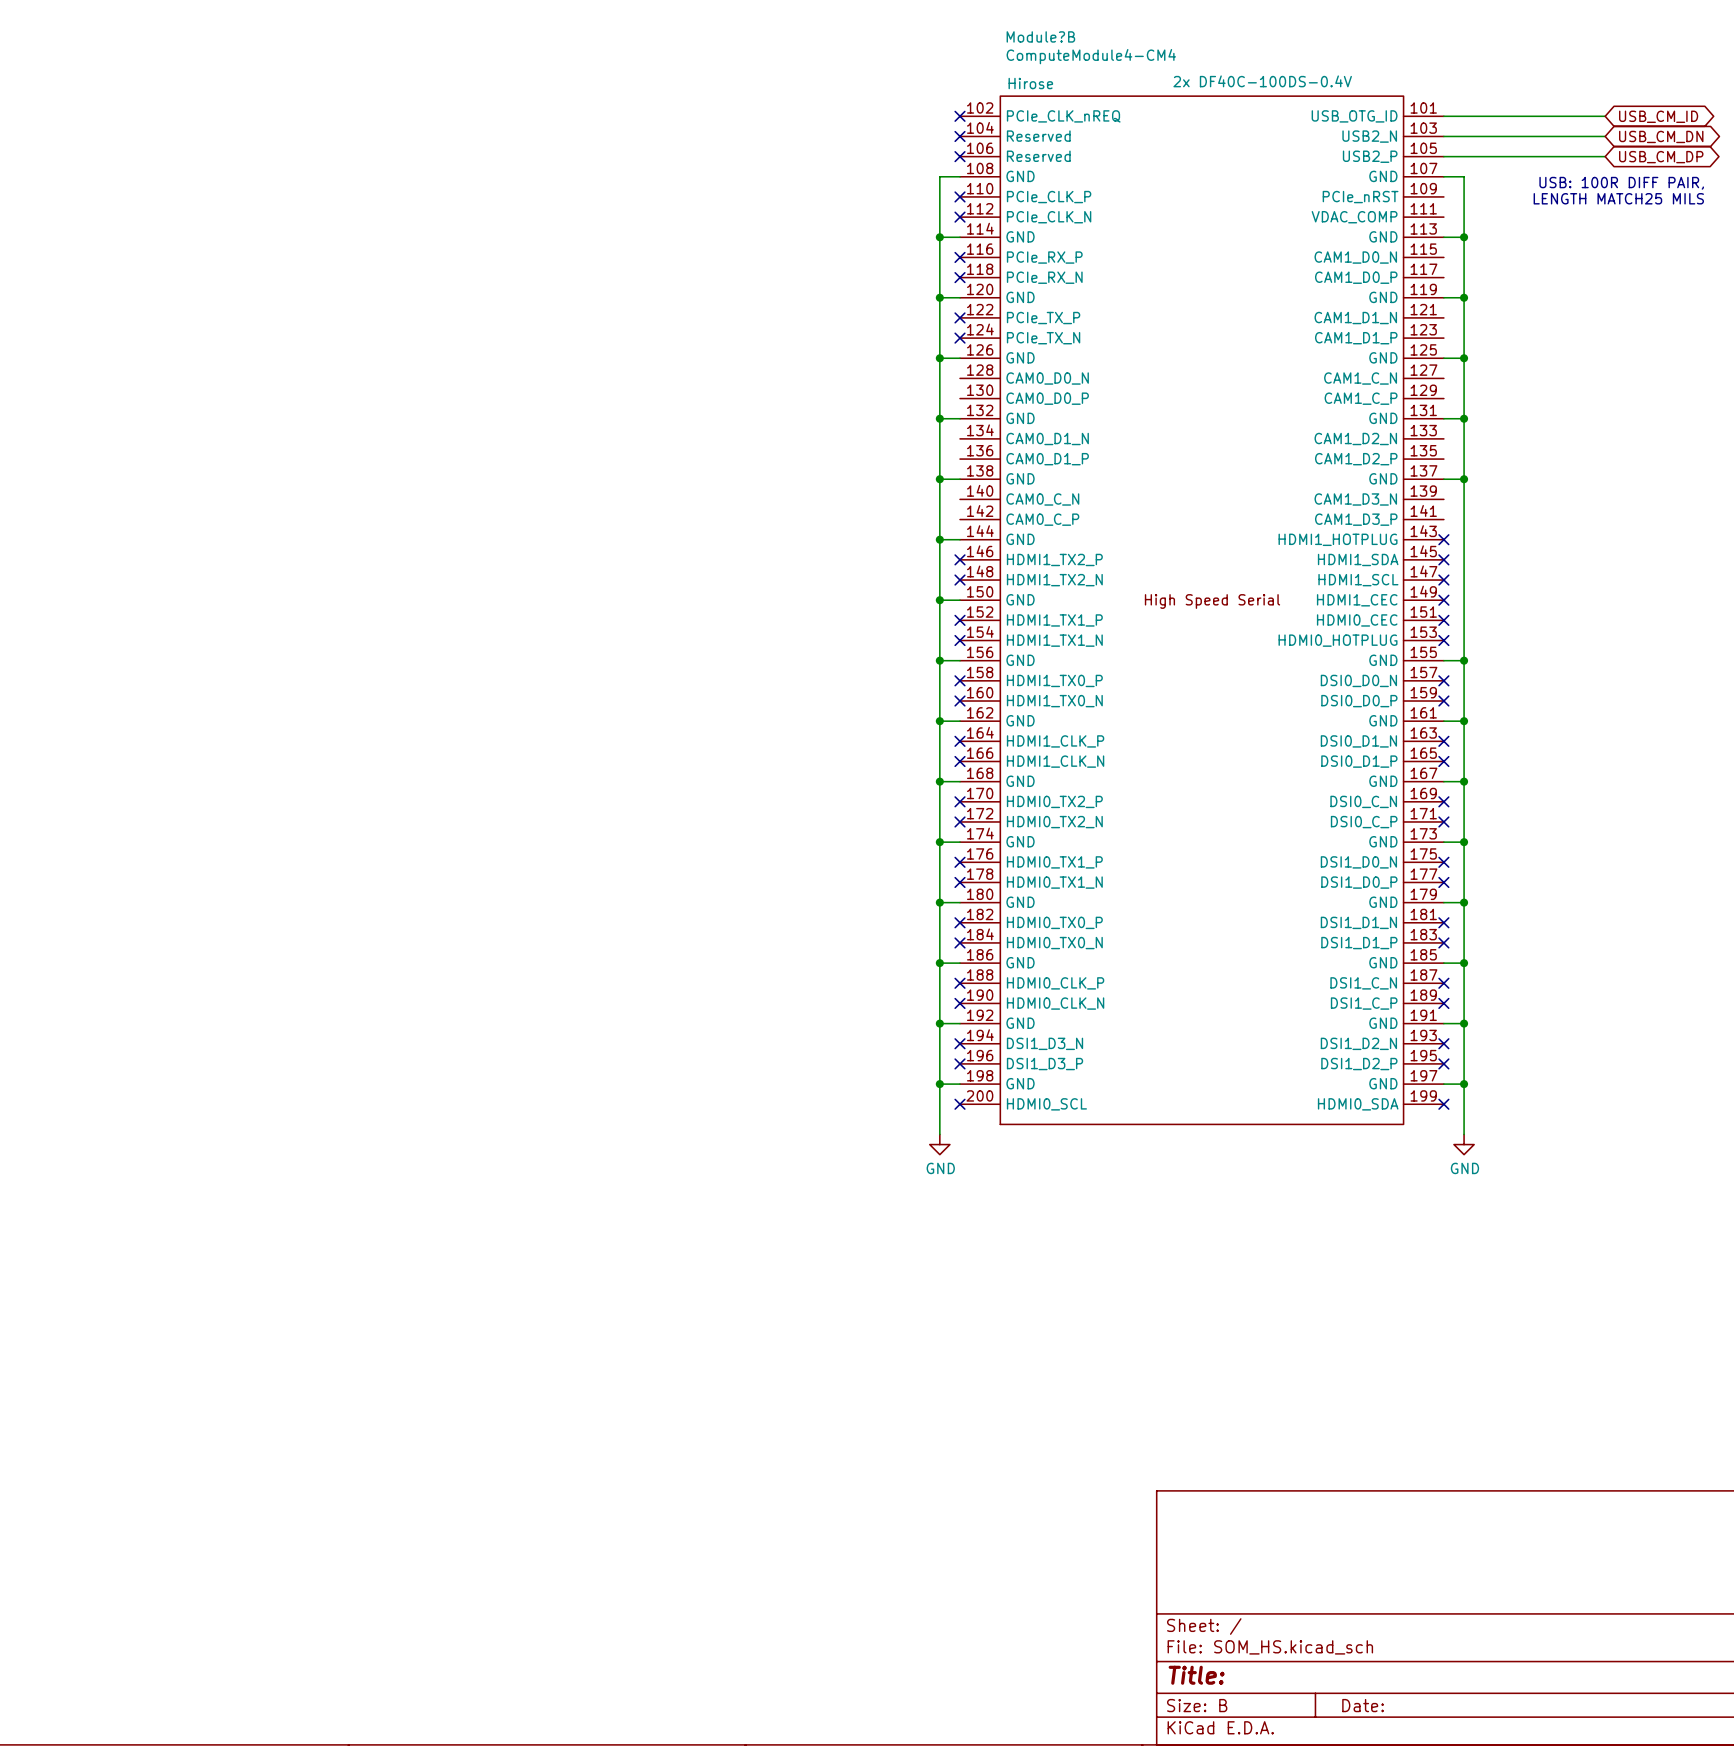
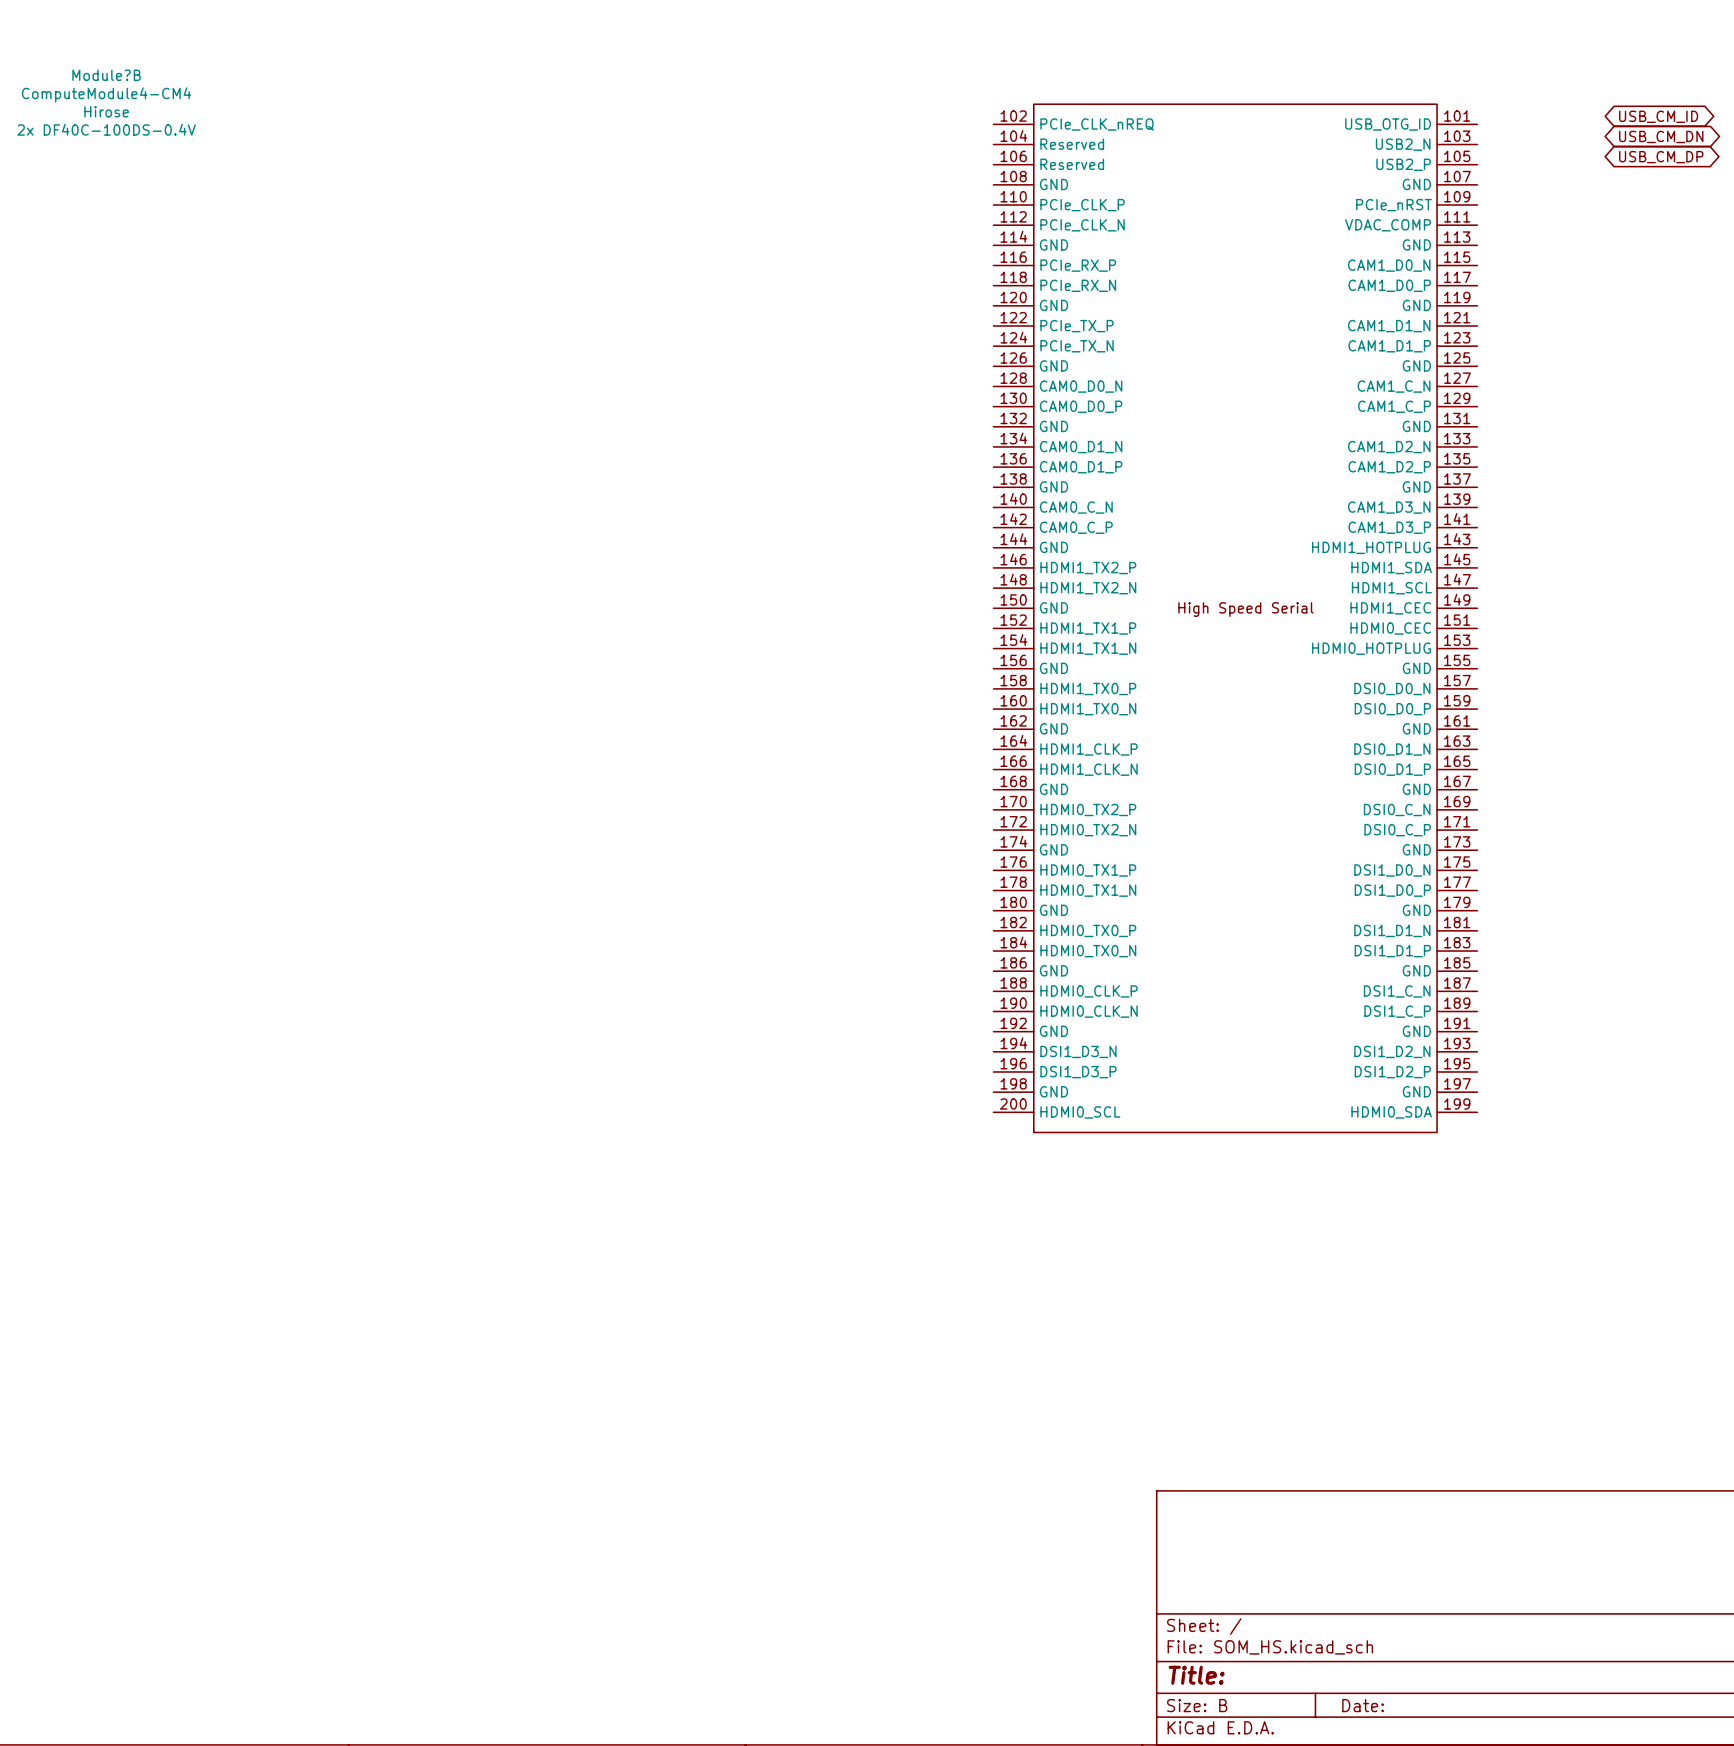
Module?B name position: Module?B (1040, 36) -> Module?B (106, 75)
Module?B value position: ComputeModule4-CM4 (1091, 56) -> ComputeModule4-CM4 (106, 94)
Module?B text position: 2x DF40C-100DS-0.4V (1262, 81) -> 2x DF40C-100DS-0.4V (106, 129)
Module?B text position: Hirose (1030, 83) -> Hirose (106, 111)
no-connect mark: (960, 116) -> none
wire: (1443, 116) (1605, 116) -> none
no-connect mark: (960, 136) -> none
wire: (1443, 136) (1605, 136) -> none
no-connect mark: (960, 156) -> none
wire: (1443, 156) (1605, 156) -> none
wire: (960, 176) (939, 176) (939, 1134) -> none
wire: (1443, 176) (1464, 176) (1464, 1134) -> none
text: USB: 100R DIFF PAIR, (1621, 183) -> none
no-connect mark: (960, 196) -> none
text: LENGTH MATCH25 MILS (1618, 198) -> none
no-connect mark: (960, 217) -> none
wire: (939, 237) (960, 237) -> none
junction: (939, 237) -> none
wire: (1443, 237) (1464, 237) -> none
junction: (1464, 237) -> none
no-connect mark: (960, 257) -> none
no-connect mark: (960, 277) -> none
wire: (939, 297) (960, 297) -> none
junction: (939, 297) -> none
wire: (1443, 297) (1464, 297) -> none
junction: (1464, 297) -> none
no-connect mark: (960, 317) -> none
no-connect mark: (960, 338) -> none
wire: (939, 358) (960, 358) -> none
junction: (939, 358) -> none
wire: (1443, 358) (1464, 358) -> none
junction: (1464, 358) -> none
wire: (939, 418) (960, 418) -> none
junction: (939, 418) -> none
wire: (1443, 418) (1464, 418) -> none
junction: (1464, 418) -> none
wire: (939, 479) (960, 479) -> none
junction: (939, 479) -> none
wire: (1443, 479) (1464, 479) -> none
junction: (1464, 479) -> none
wire: (939, 539) (960, 539) -> none
junction: (939, 539) -> none
no-connect mark: (1443, 539) -> none
no-connect mark: (960, 559) -> none
no-connect mark: (1443, 559) -> none
no-connect mark: (960, 580) -> none
no-connect mark: (1443, 580) -> none
wire: (939, 600) (960, 600) -> none
junction: (939, 600) -> none
no-connect mark: (1443, 600) -> none
Module?B position: (1201, 610) -> (1235, 618)
no-connect mark: (960, 620) -> none
no-connect mark: (1443, 620) -> none
no-connect mark: (960, 640) -> none
no-connect mark: (1443, 640) -> none
wire: (939, 660) (960, 660) -> none
junction: (939, 660) -> none
wire: (1443, 660) (1464, 660) -> none
junction: (1464, 660) -> none
no-connect mark: (960, 680) -> none
no-connect mark: (1443, 680) -> none
no-connect mark: (960, 701) -> none
no-connect mark: (1443, 701) -> none
wire: (939, 721) (960, 721) -> none
junction: (939, 721) -> none
wire: (1443, 721) (1464, 721) -> none
junction: (1464, 721) -> none
no-connect mark: (960, 741) -> none
no-connect mark: (1443, 741) -> none
no-connect mark: (960, 761) -> none
no-connect mark: (1443, 761) -> none
wire: (939, 781) (960, 781) -> none
junction: (939, 781) -> none
wire: (1443, 781) (1464, 781) -> none
junction: (1464, 781) -> none
no-connect mark: (960, 801) -> none
no-connect mark: (1443, 801) -> none
no-connect mark: (960, 821) -> none
no-connect mark: (1443, 821) -> none
wire: (939, 842) (960, 842) -> none
junction: (939, 842) -> none
wire: (1443, 842) (1464, 842) -> none
junction: (1464, 842) -> none
no-connect mark: (960, 862) -> none
no-connect mark: (1443, 862) -> none
no-connect mark: (960, 882) -> none
no-connect mark: (1443, 882) -> none
wire: (939, 902) (960, 902) -> none
junction: (939, 902) -> none
wire: (1443, 902) (1464, 902) -> none
junction: (1464, 902) -> none
no-connect mark: (960, 922) -> none
no-connect mark: (1443, 922) -> none
no-connect mark: (960, 942) -> none
no-connect mark: (1443, 942) -> none
wire: (939, 963) (960, 963) -> none
junction: (939, 963) -> none
wire: (1443, 963) (1464, 963) -> none
junction: (1464, 963) -> none
no-connect mark: (960, 983) -> none
no-connect mark: (1443, 983) -> none
no-connect mark: (960, 1003) -> none
no-connect mark: (1443, 1003) -> none
wire: (939, 1023) (960, 1023) -> none
junction: (939, 1023) -> none
wire: (1443, 1023) (1464, 1023) -> none
junction: (1464, 1023) -> none
no-connect mark: (960, 1043) -> none
no-connect mark: (1443, 1043) -> none
no-connect mark: (960, 1063) -> none
no-connect mark: (1443, 1063) -> none
wire: (939, 1084) (960, 1084) -> none
junction: (939, 1084) -> none
wire: (1443, 1084) (1464, 1084) -> none
junction: (1464, 1084) -> none
no-connect mark: (960, 1104) -> none
no-connect mark: (1443, 1104) -> none
power symbol: GND (939, 1144) -> none
power symbol: GND (1464, 1144) -> none

